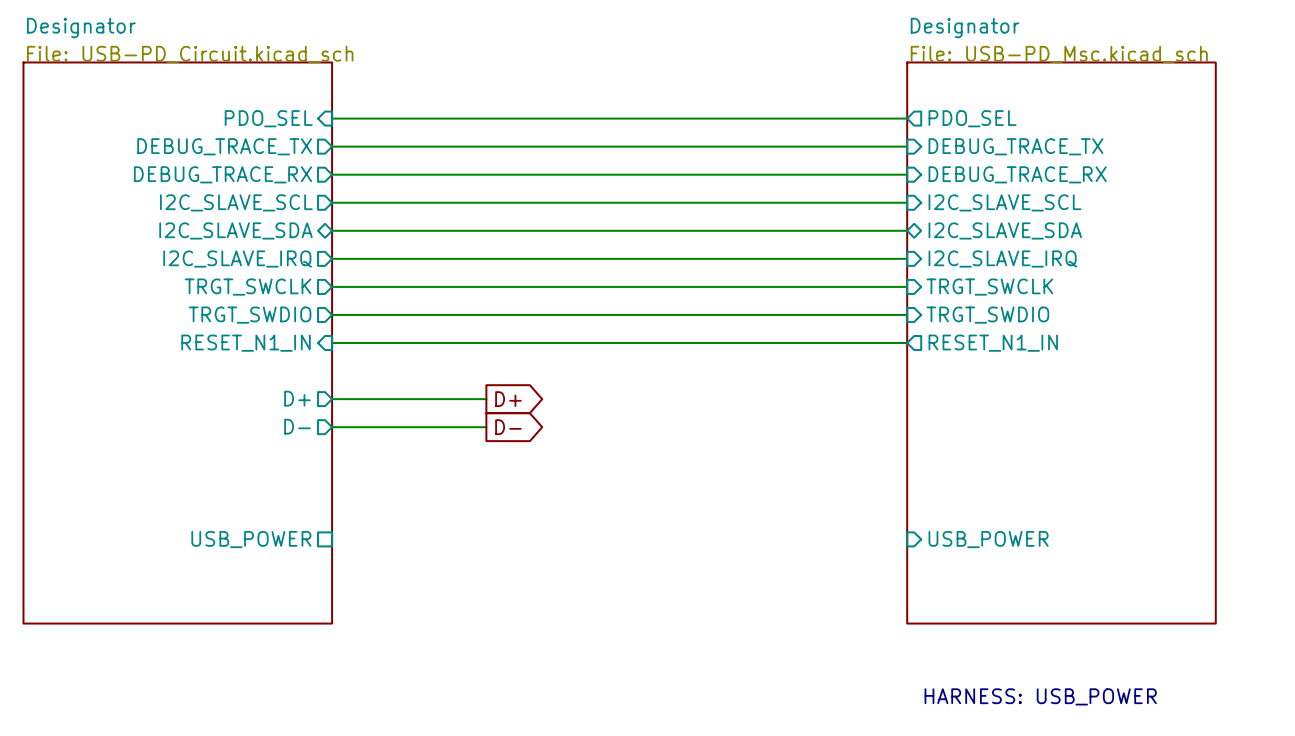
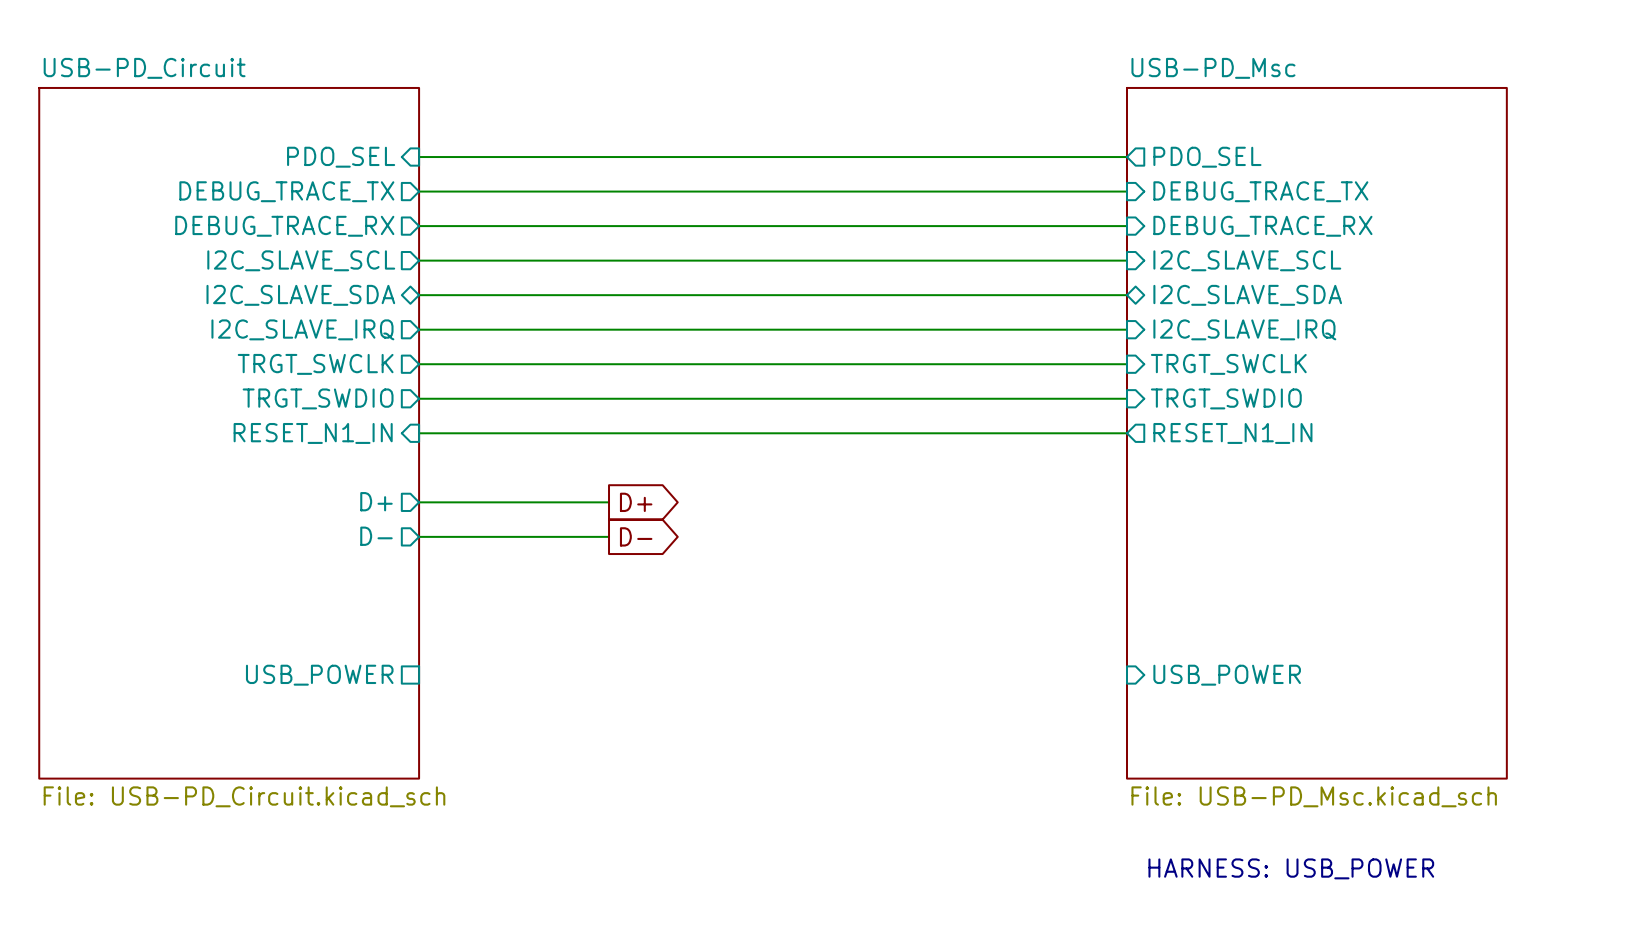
sheet Designator name: Designator (81, 28) -> USB-PD_Circuit (144, 68)
sheet Designator name: Designator (965, 28) -> USB-PD_Msc (1213, 68)
sheet Designator value position: File: USB-PD_Circuit.kicad_sch (190, 54) -> File: USB-PD_Circuit.kicad_sch (244, 796)
sheet Designator value position: File: USB-PD_Msc.kicad_sch (1059, 54) -> File: USB-PD_Msc.kicad_sch (1314, 796)

